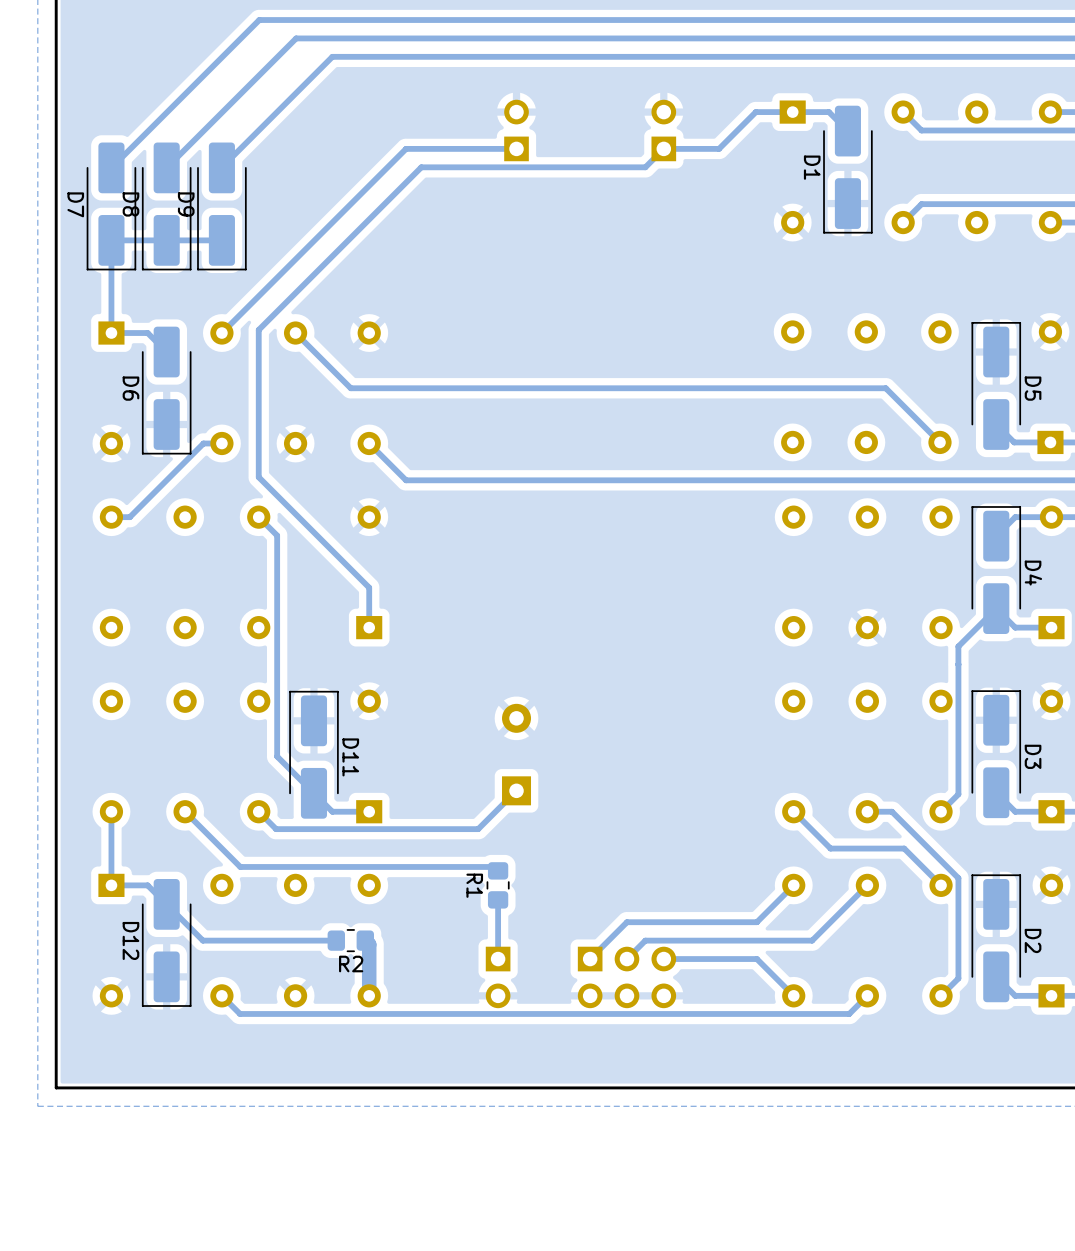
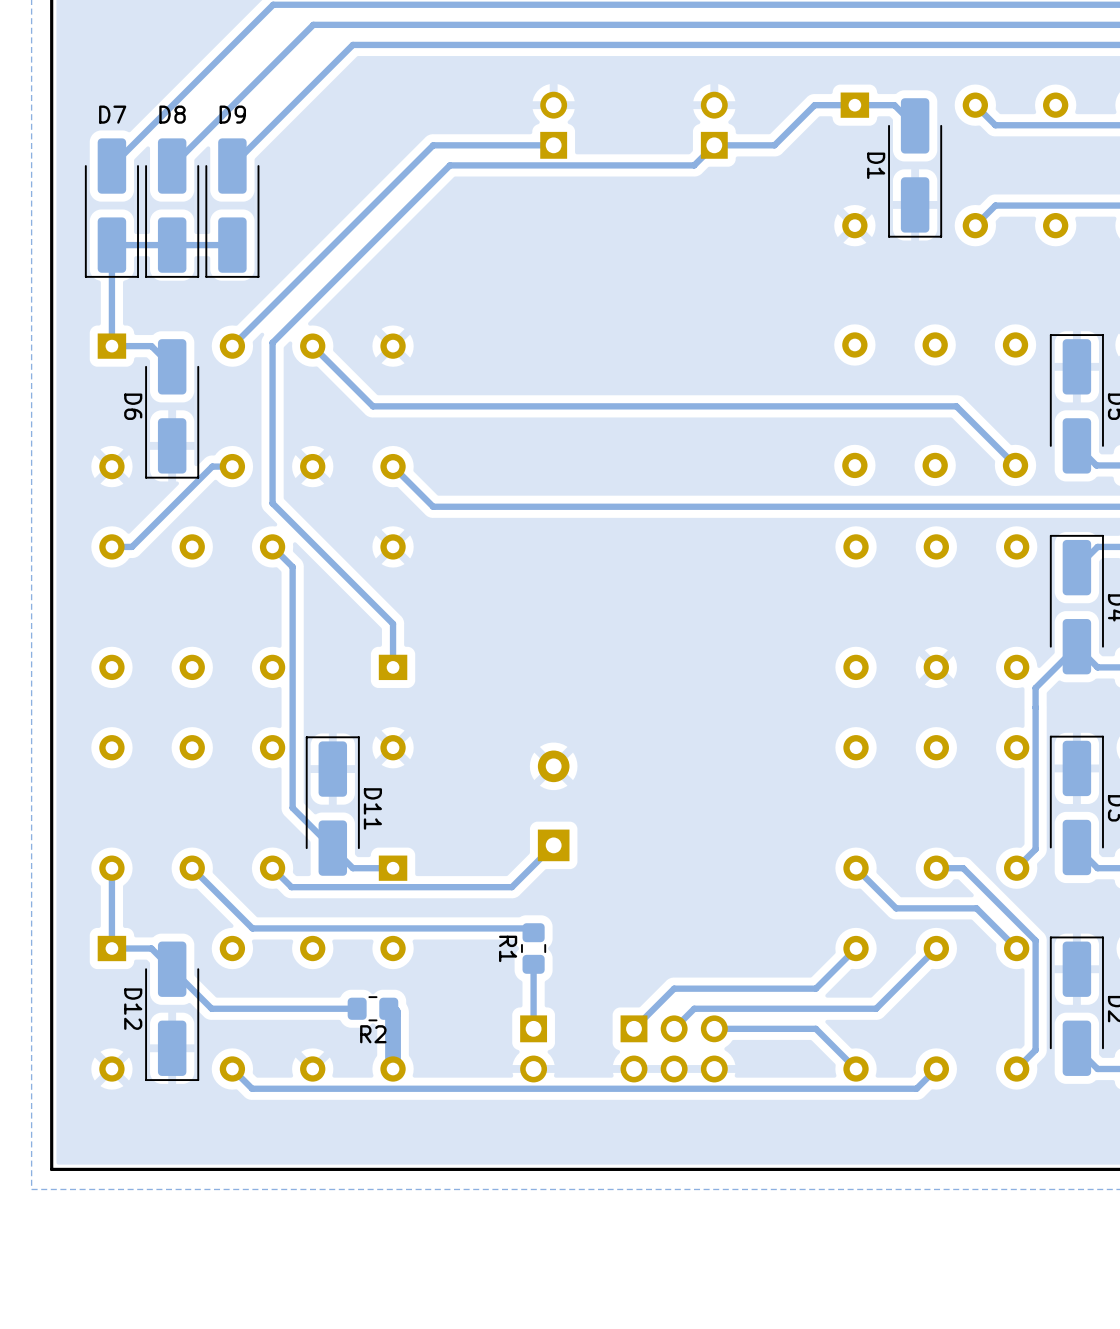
D7 name rotation: 0° (75, 204) -> 90° counterclockwise (112, 114)
D7 name position: D7 (75, 204) -> D7 (112, 114)
D8 name rotation: 0° (130, 204) -> 90° counterclockwise (172, 114)
D8 name position: D8 (130, 204) -> D8 (172, 114)
D9 name rotation: 0° (186, 204) -> 90° counterclockwise (232, 114)
D9 name position: D9 (186, 204) -> D9 (232, 114)

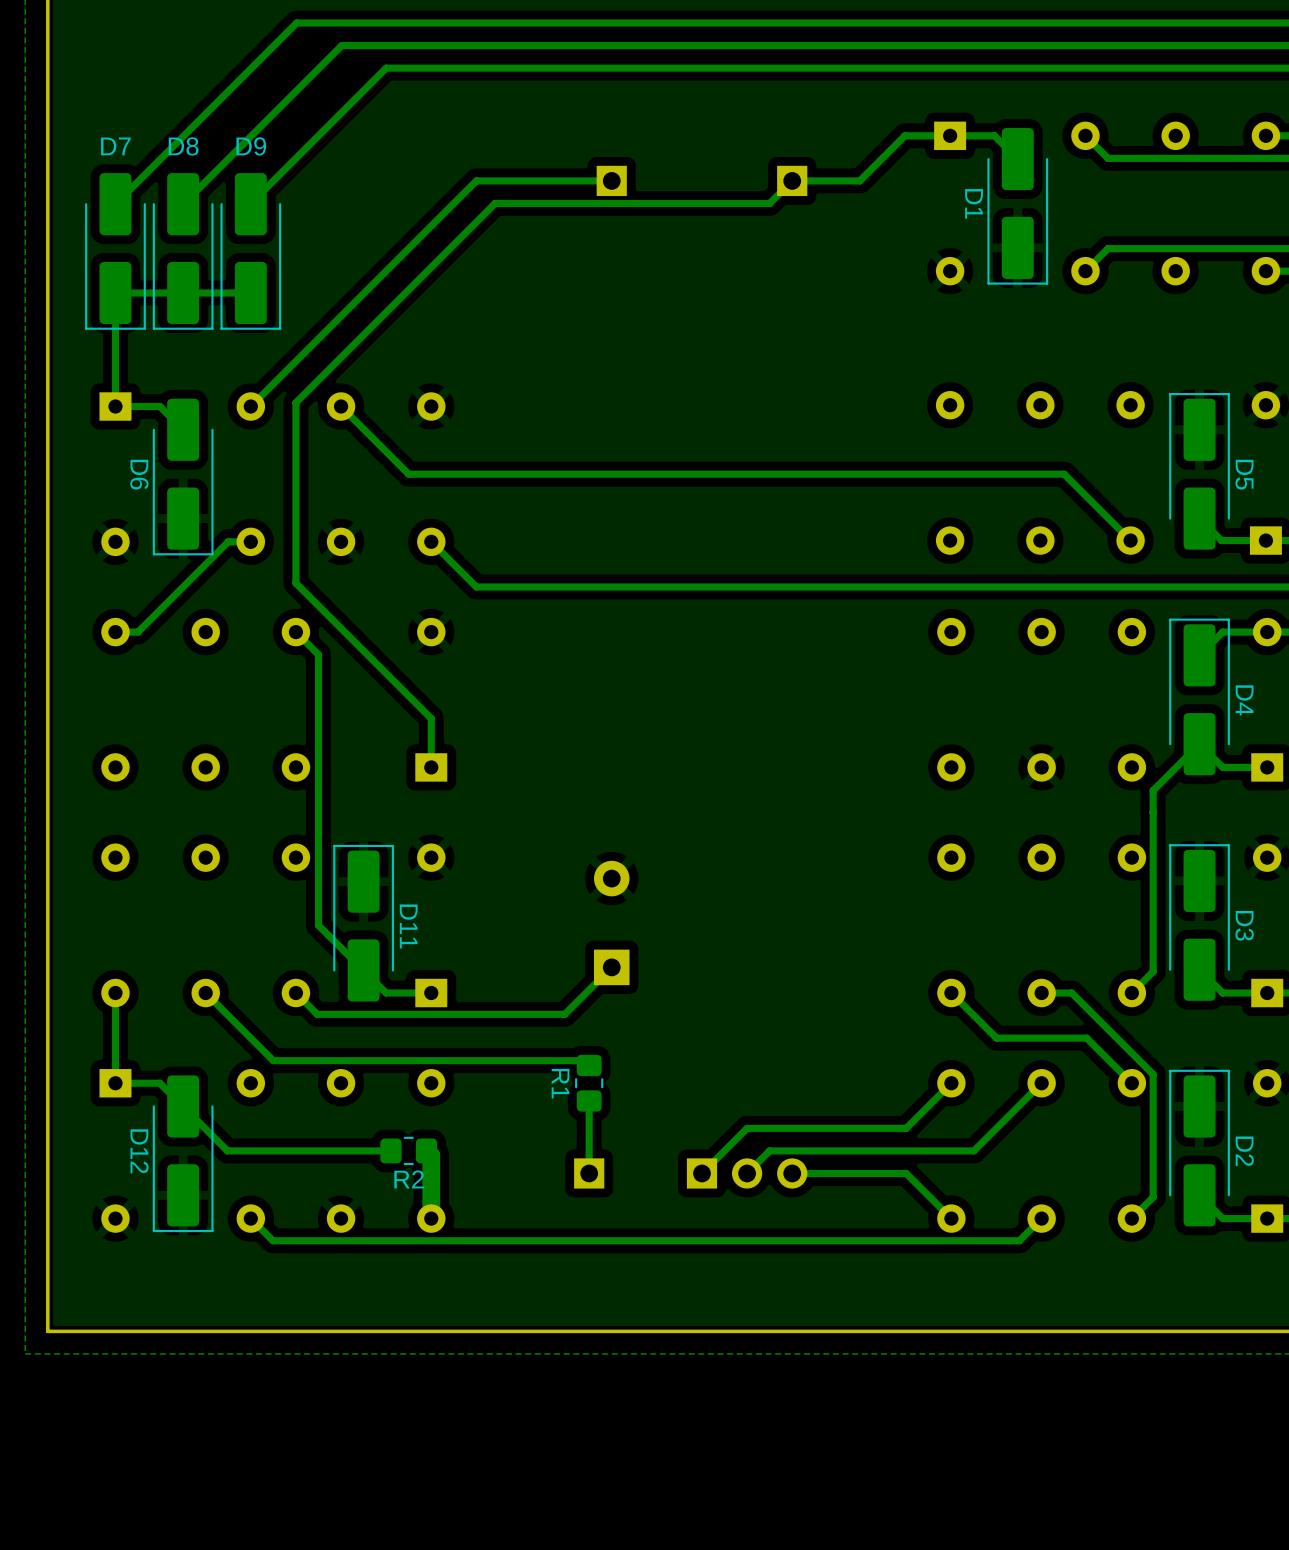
part: (553, 125) -> none
part: (714, 125) -> none
part: (533, 1048) -> none
part: (674, 1048) -> none

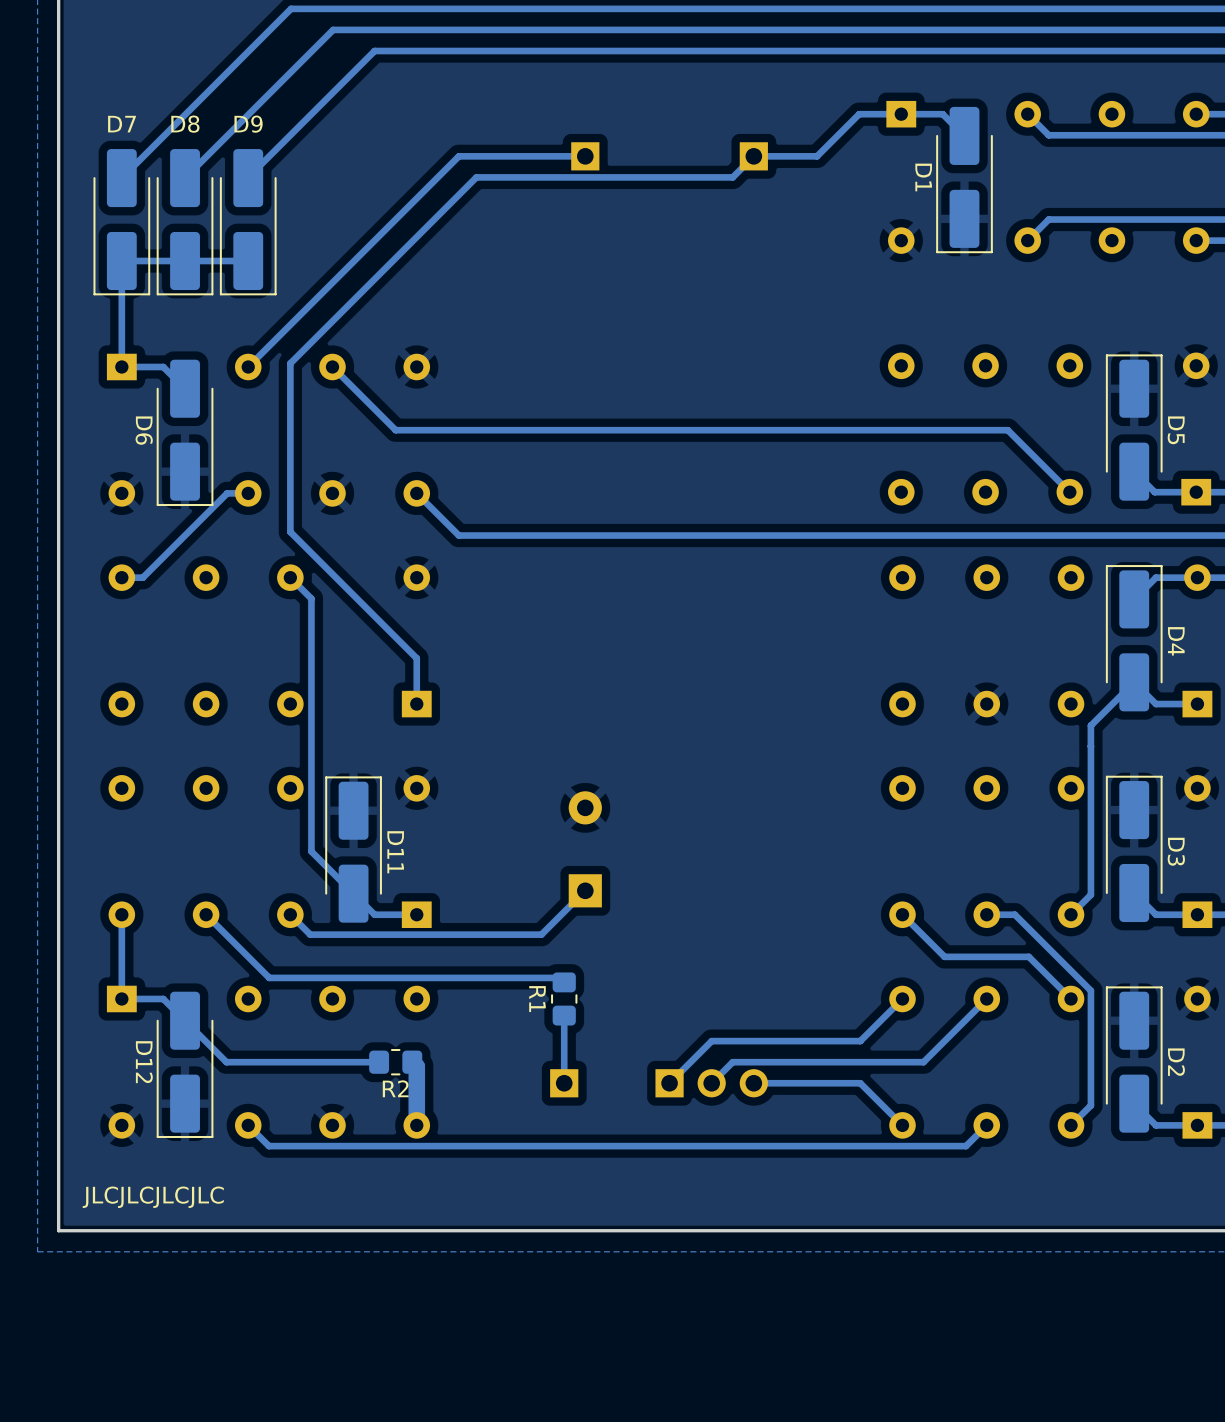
text: none -> JLCJLCJLCJLC (153, 1197)

